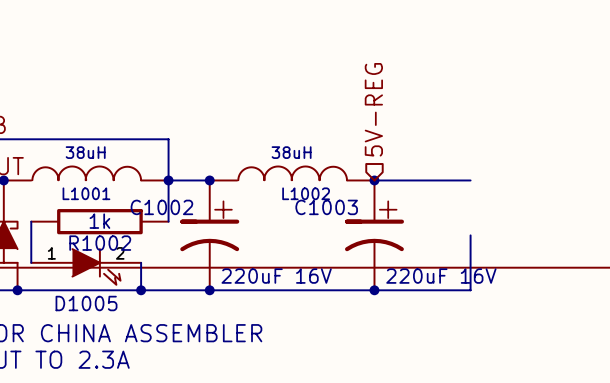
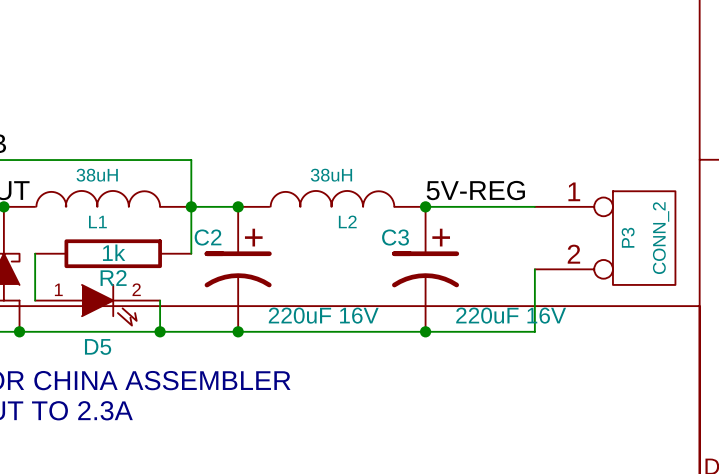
hierarchical label: 5V-REG (373, 109) -> none
label: none -> 5V-REG (475, 190)
L1001 name: L1001 (86, 193) -> L1 (97, 222)
L1002 name: L1002 (306, 193) -> L2 (347, 221)
C1002 name: C1002 (161, 207) -> C2 (208, 237)
C1003 name: C1003 (326, 207) -> C3 (395, 237)
P3: none -> CONN_2 (605, 238)
R1002 name: R1002 (100, 243) -> R2 (113, 278)
D1005 name: D1005 (86, 303) -> D5 (98, 346)

